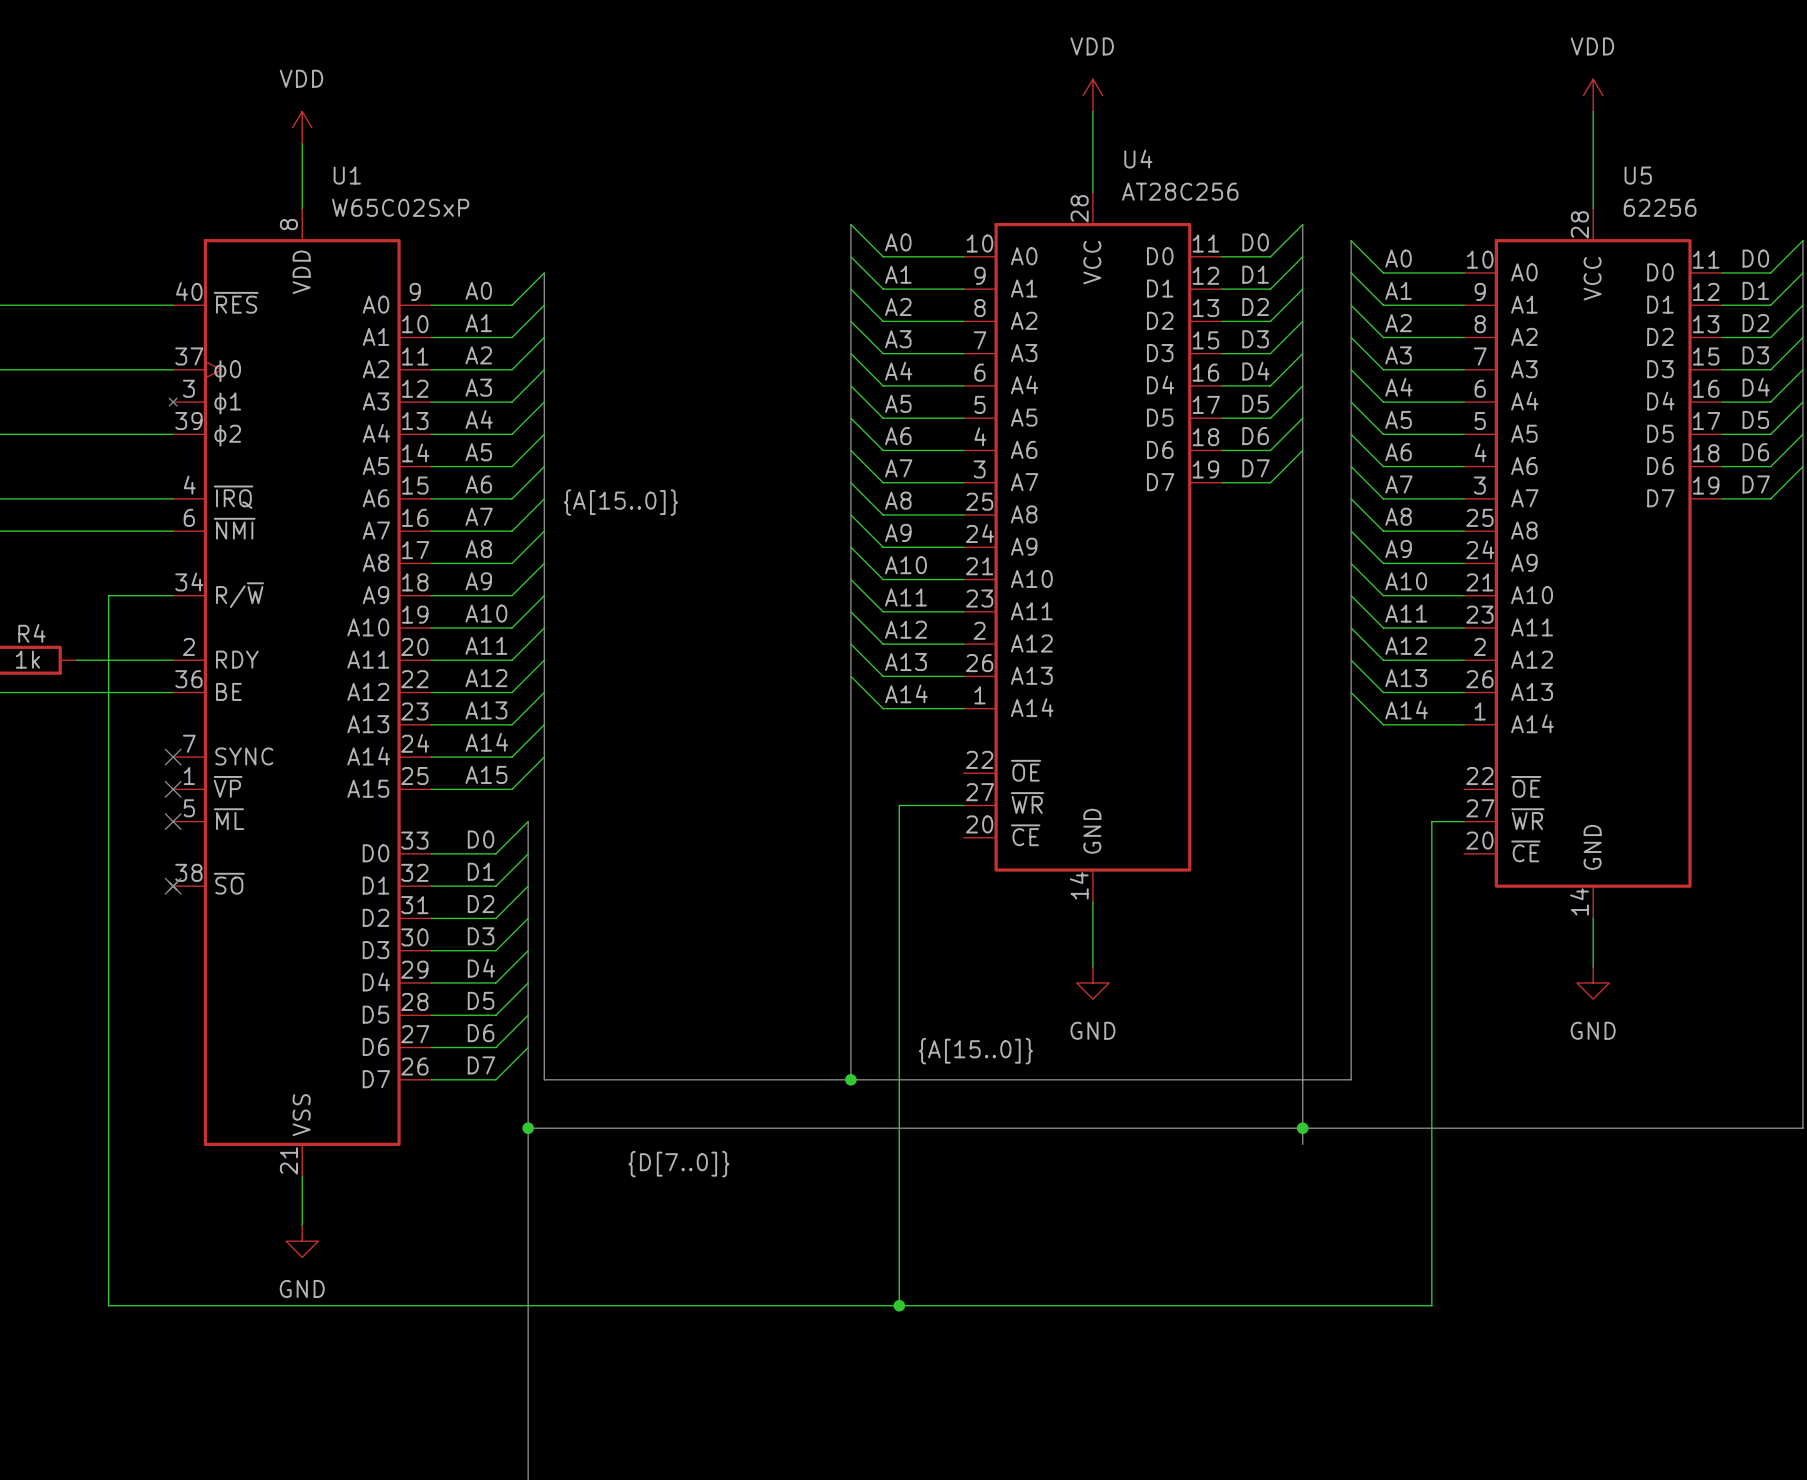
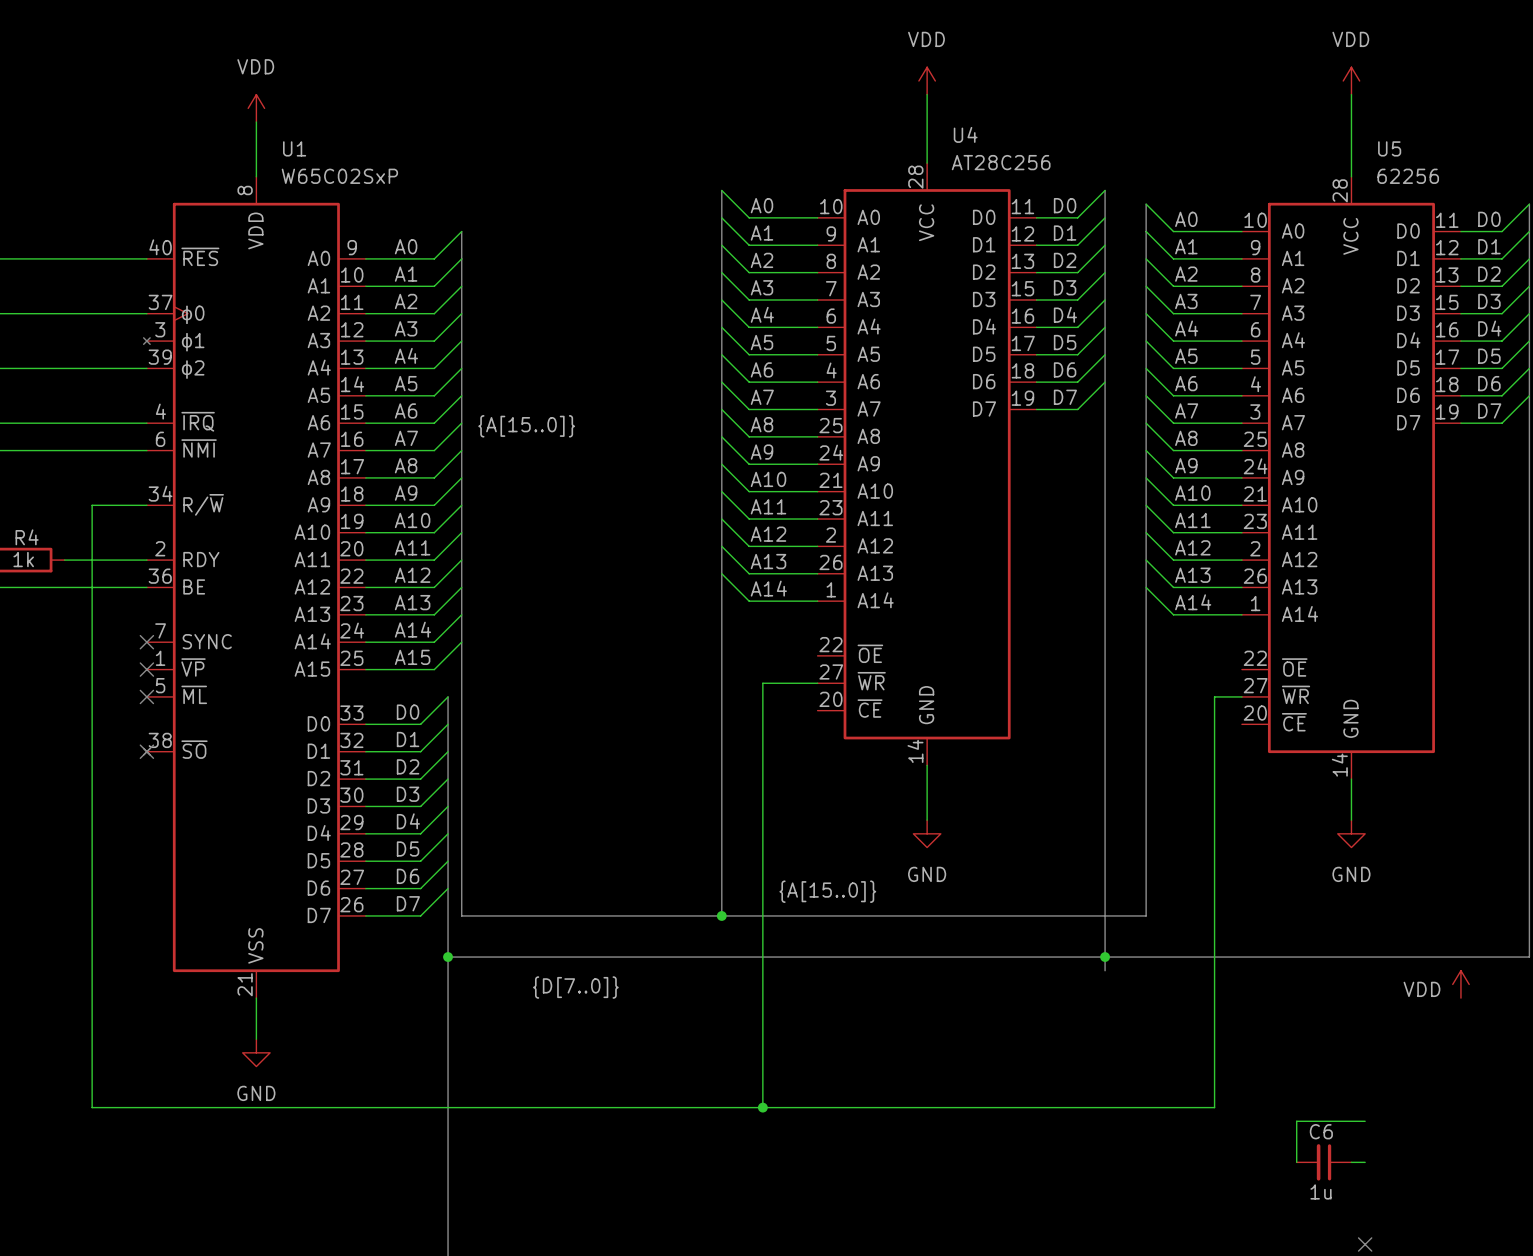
power symbol: none -> VDD (1460, 984)
wire: none -> (1365, 1121) (1296, 1121) (1296, 1162)
C6: none -> 1u (1324, 1162)
wire: none -> (1351, 1162) (1365, 1162)
no-connect mark: none -> (1365, 1244)

